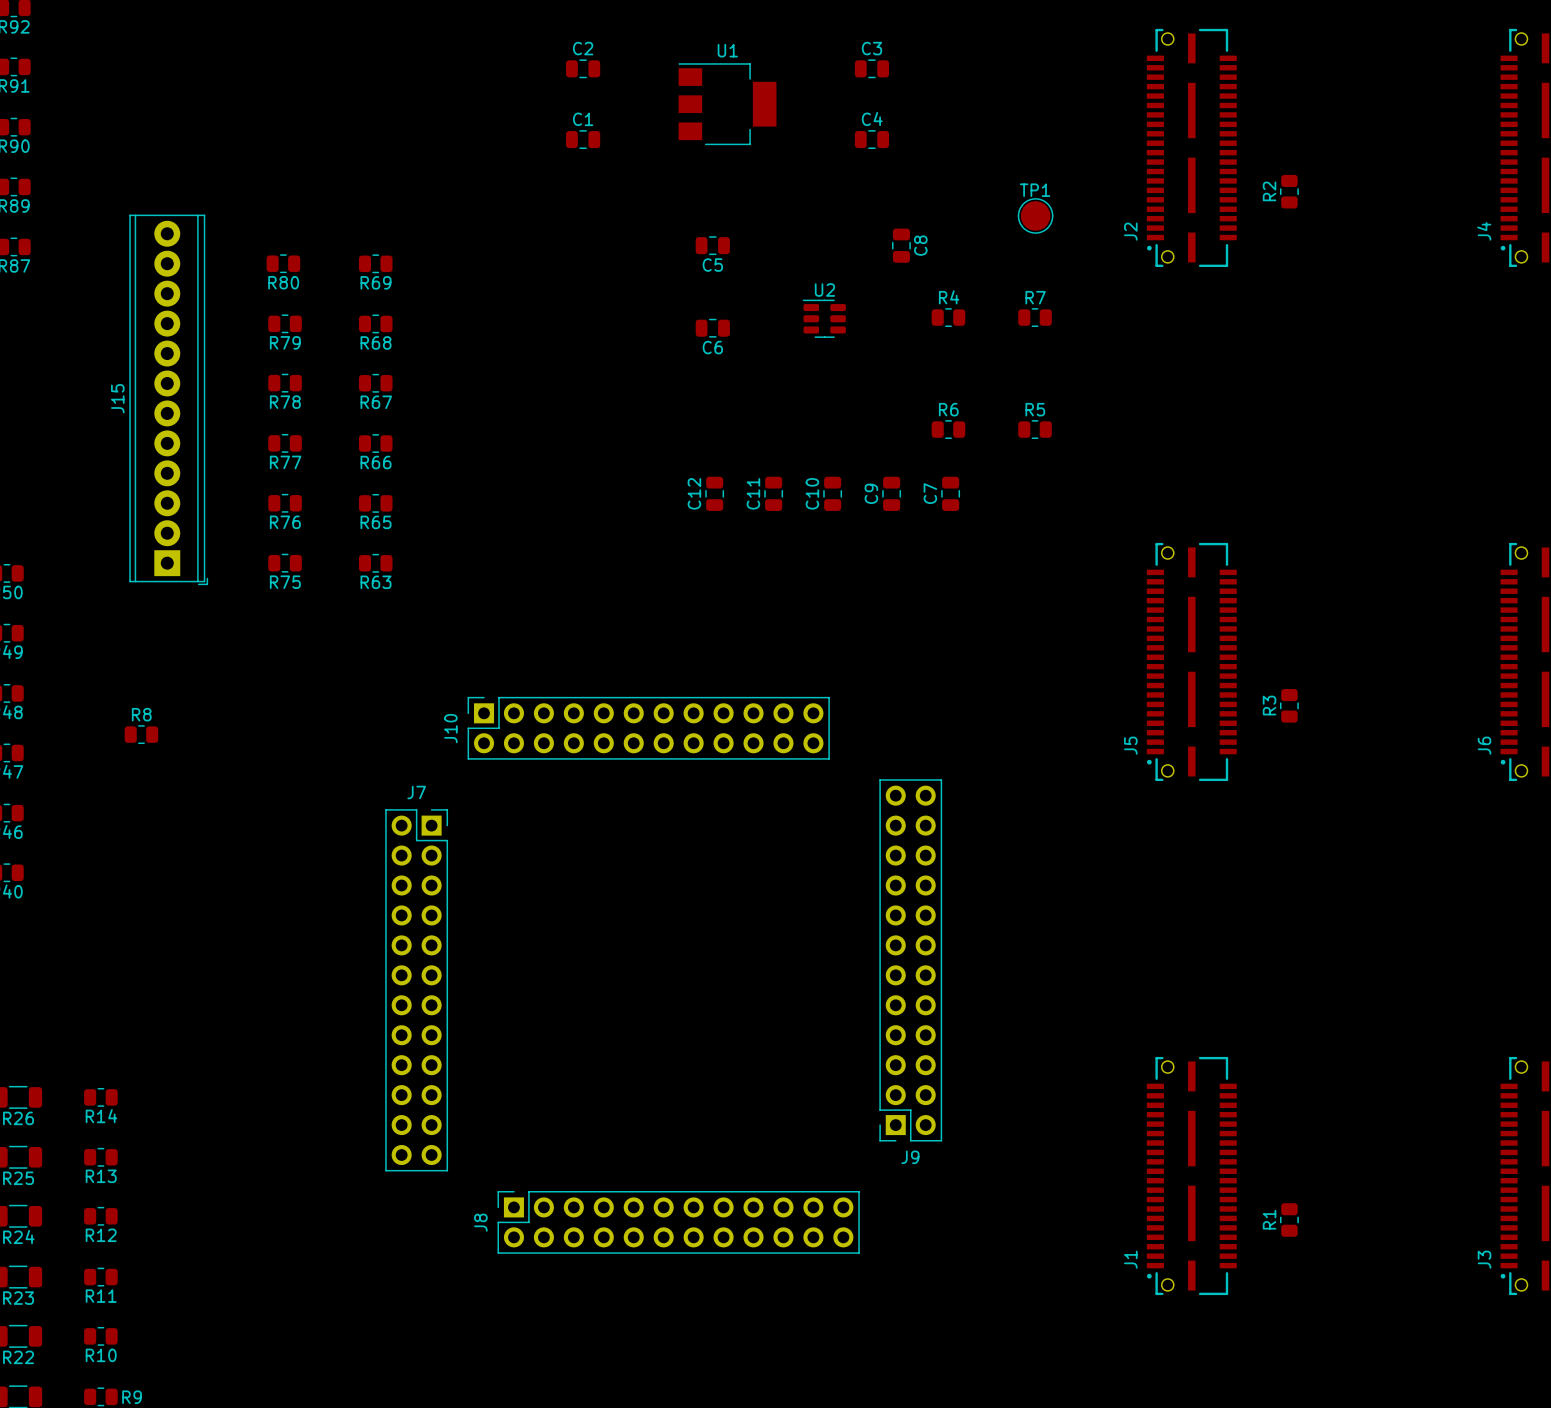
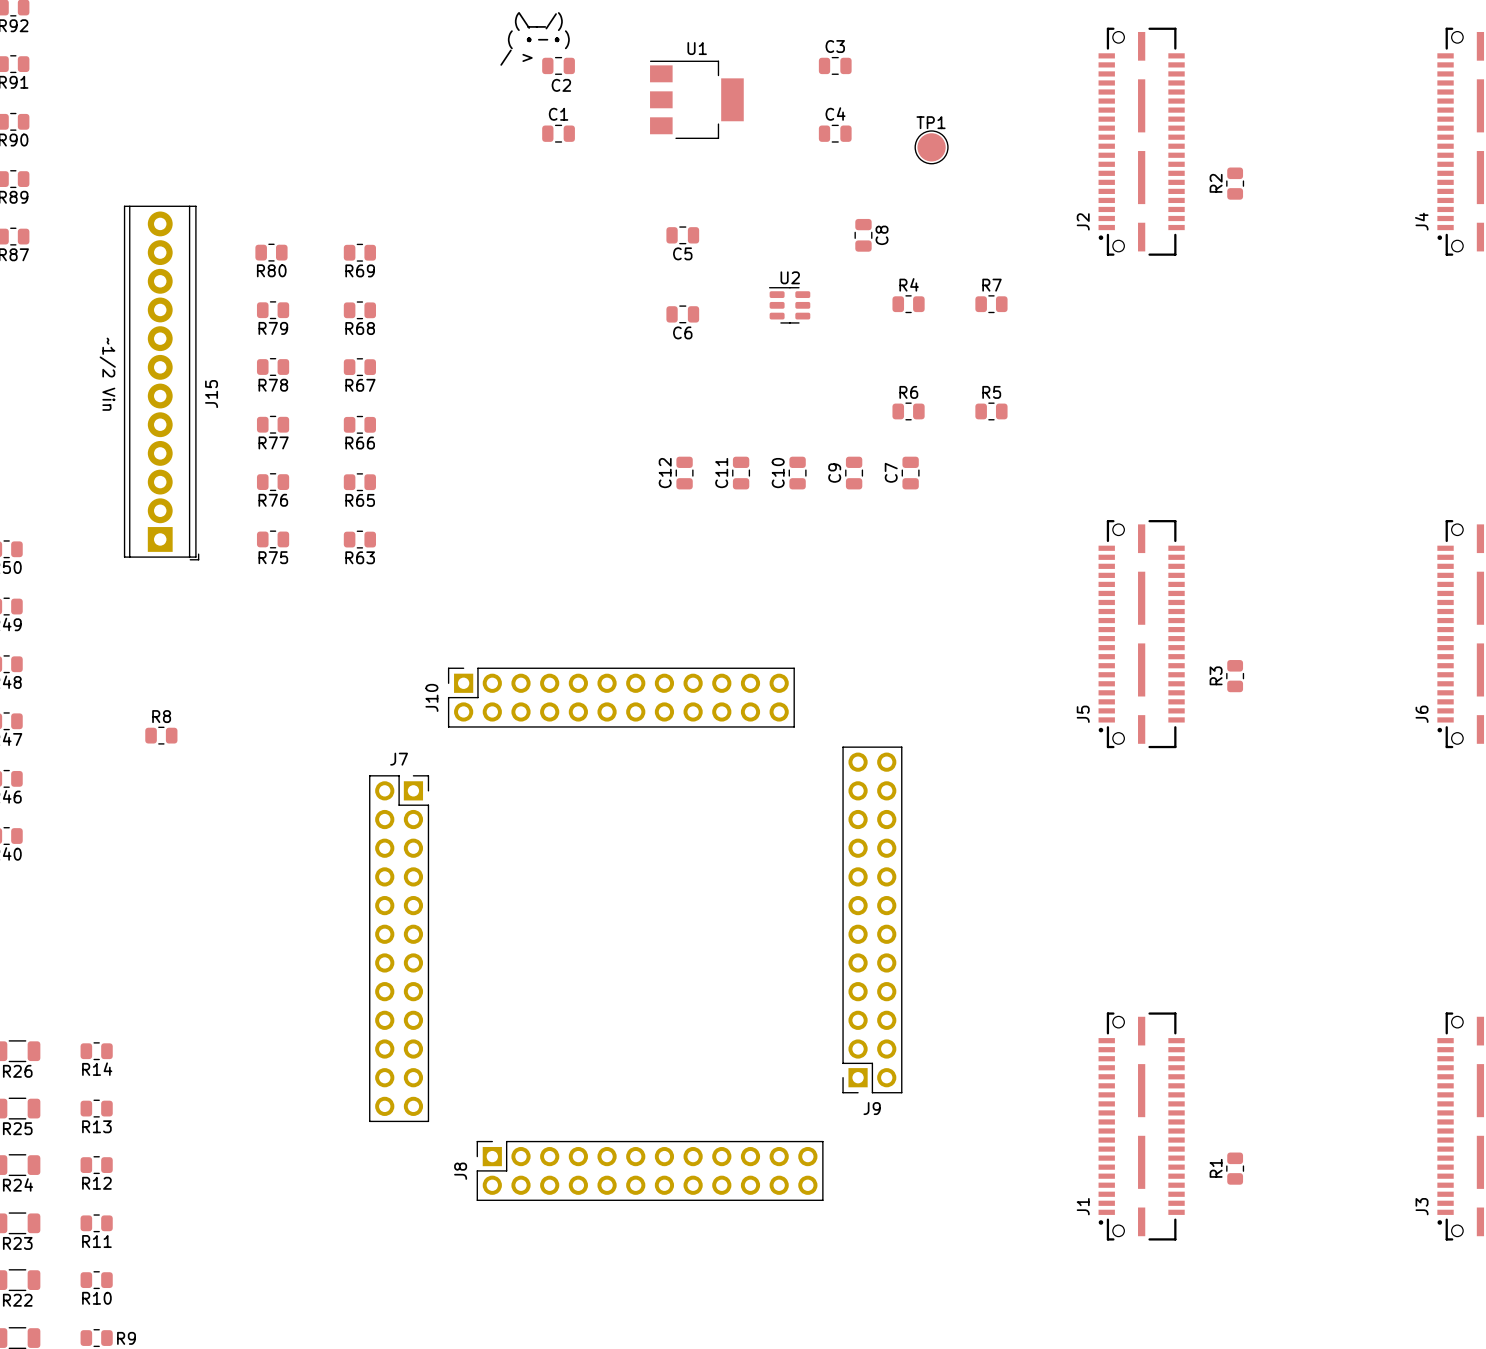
text: none -> (\__/) (538, 21)
text: none -> ( •-•) (538, 39)
C2 name position: C2 (583, 48) -> C2 (561, 85)
text: none -> / > (516, 57)
TP1 position: (1035, 215) -> (931, 147)
text: none -> ~1/2 Vin (107, 374)
J15 name position: J15 (117, 398) -> J15 (211, 394)
R8 position: (141, 734) -> (161, 735)

